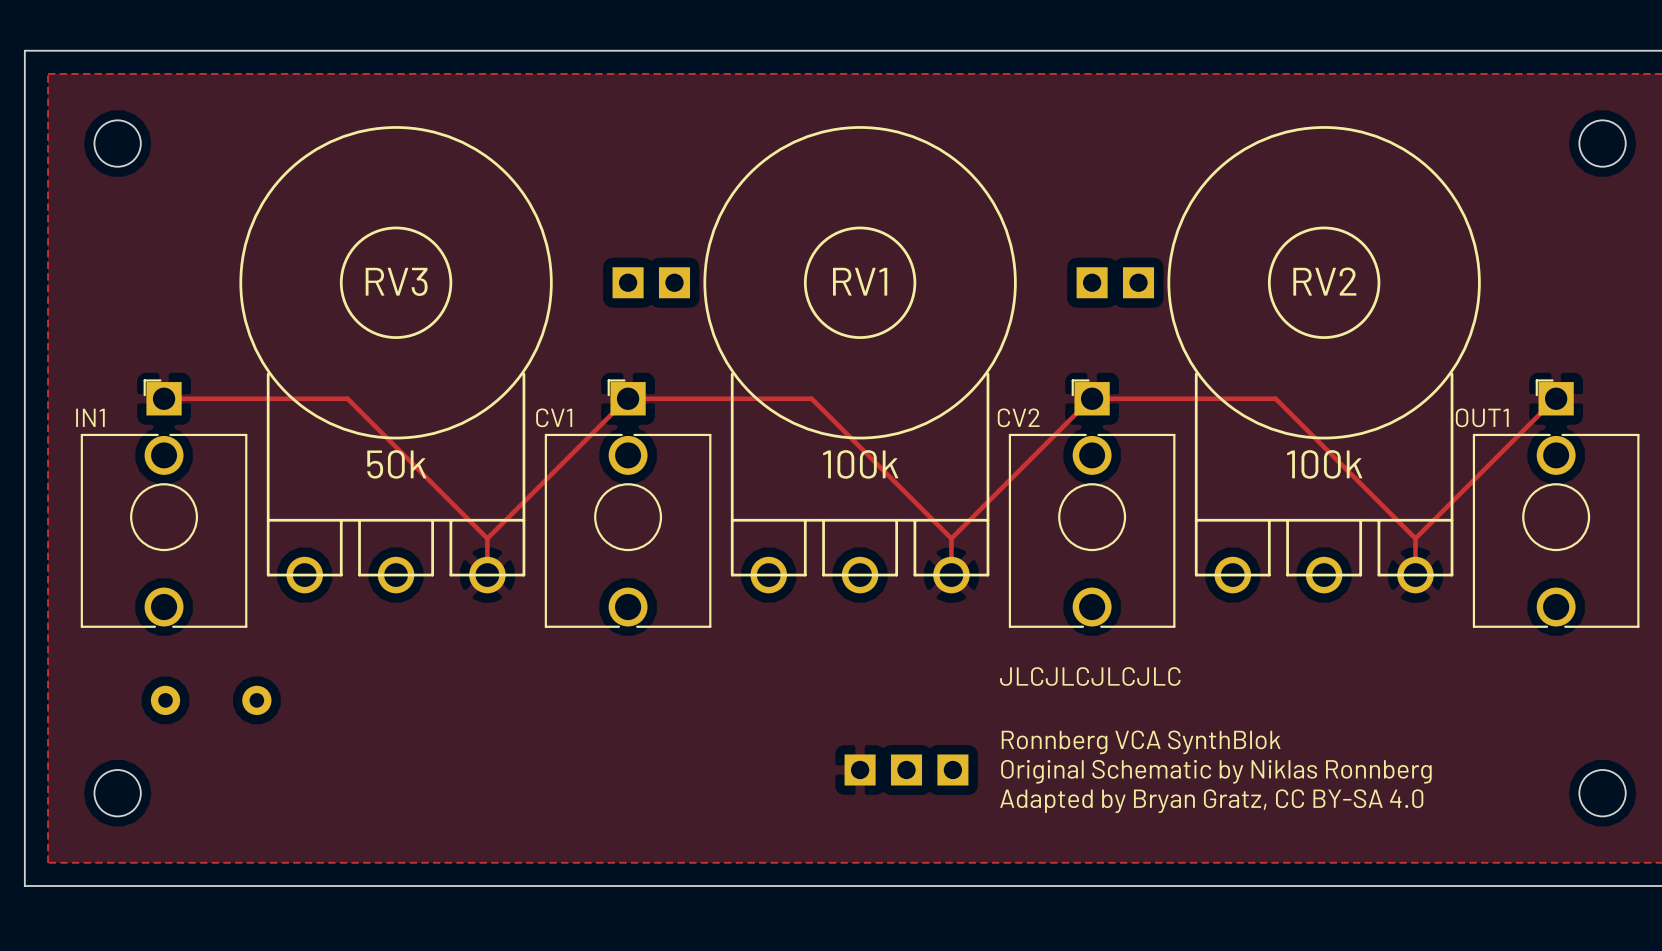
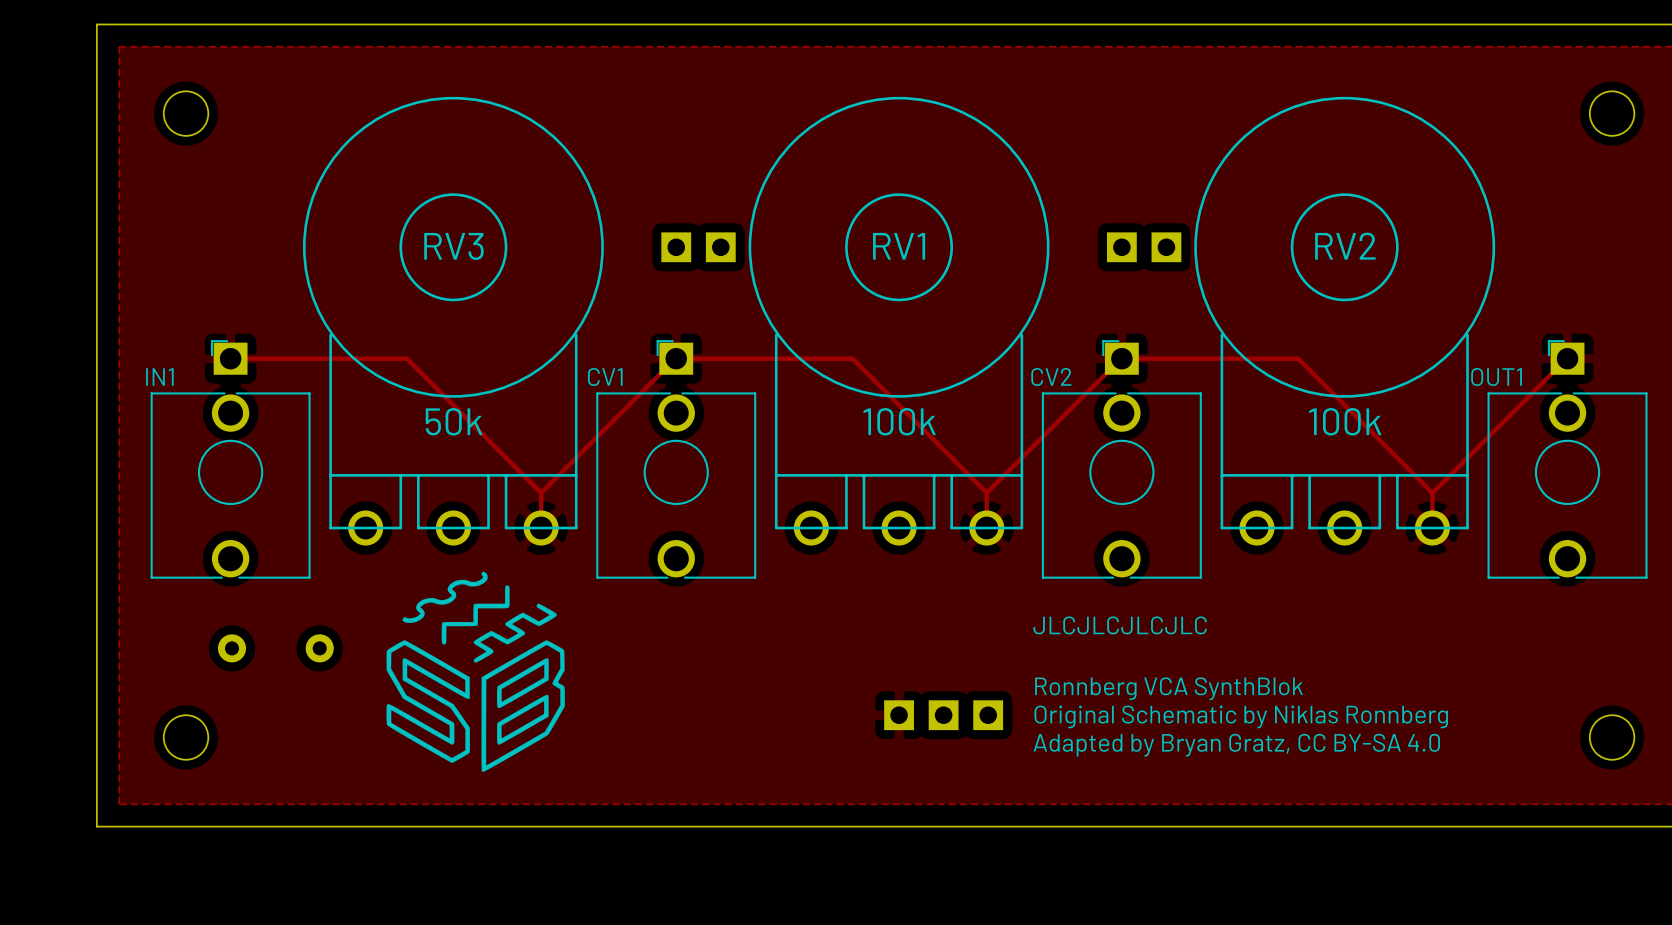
drawing: none -> [386, 571, 565, 772]

